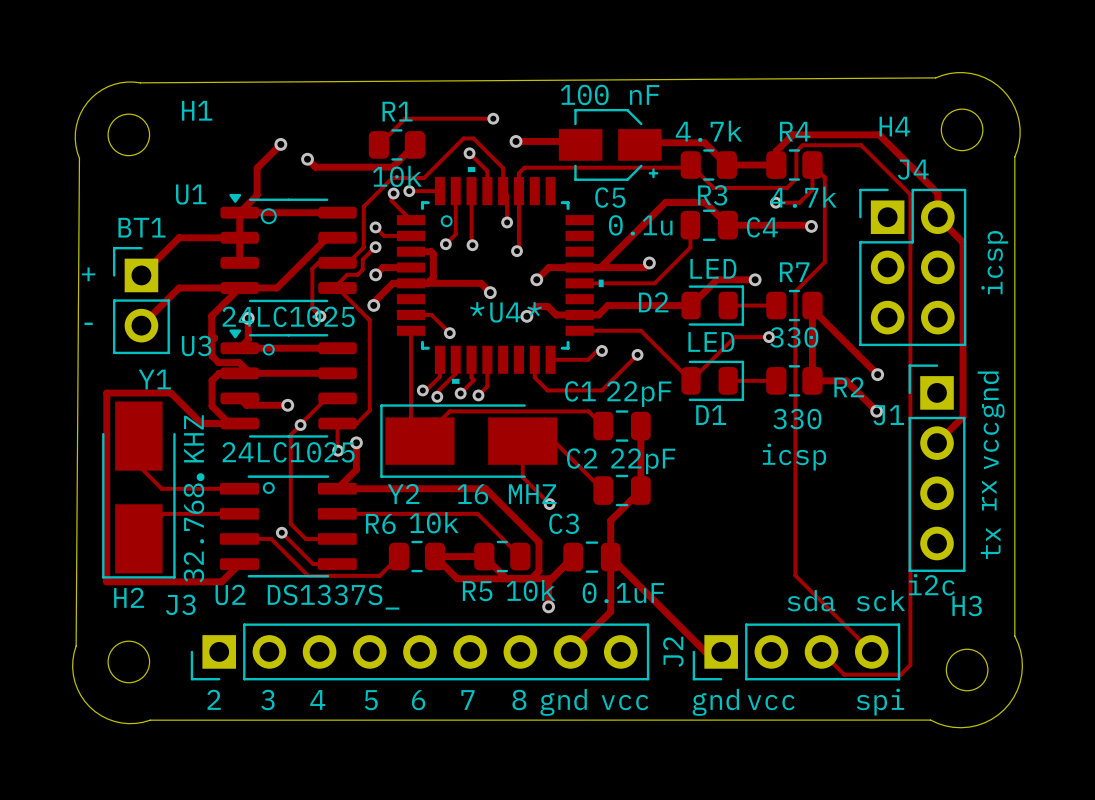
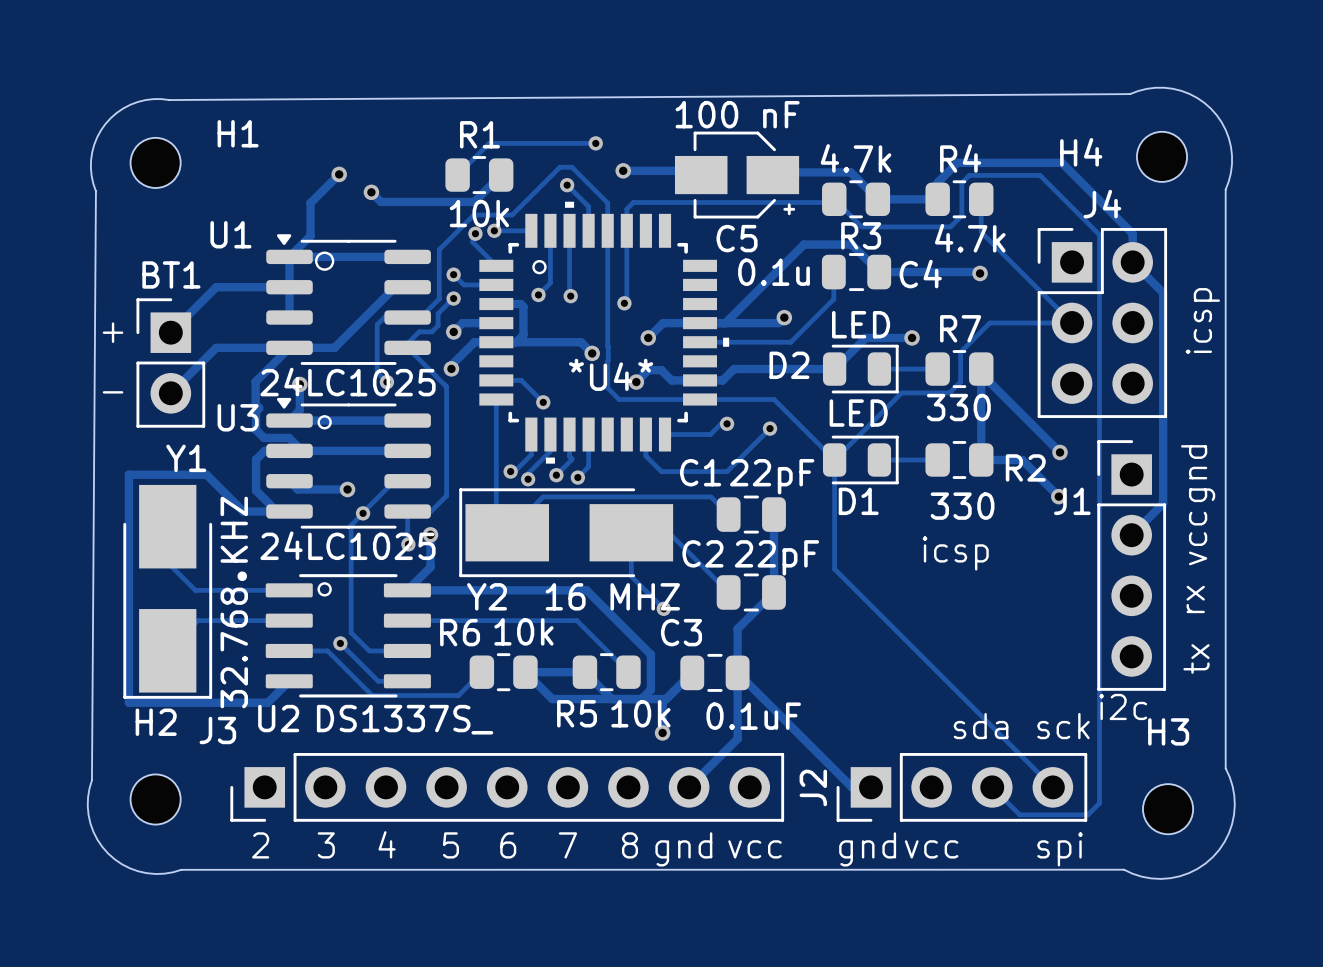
track: (812, 165) (824, 177) (824, 262) (819, 267) -> (981, 229) (981, 232) (1072, 322) (989, 322)
track: (812, 189) (799, 202) (775, 202) -> none
track: (503, 191) (507, 195) (507, 222) -> (607, 230) (607, 388) (619, 399) (700, 399)
via: (775, 202) -> none
via: (507, 222) -> none
track: (795, 316) (795, 575) -> (834, 459) (834, 569) (960, 695)
track: (734, 337) (768, 337) -> (887, 407) (901, 392) (949, 392) (960, 381)
via: (768, 337) -> none

